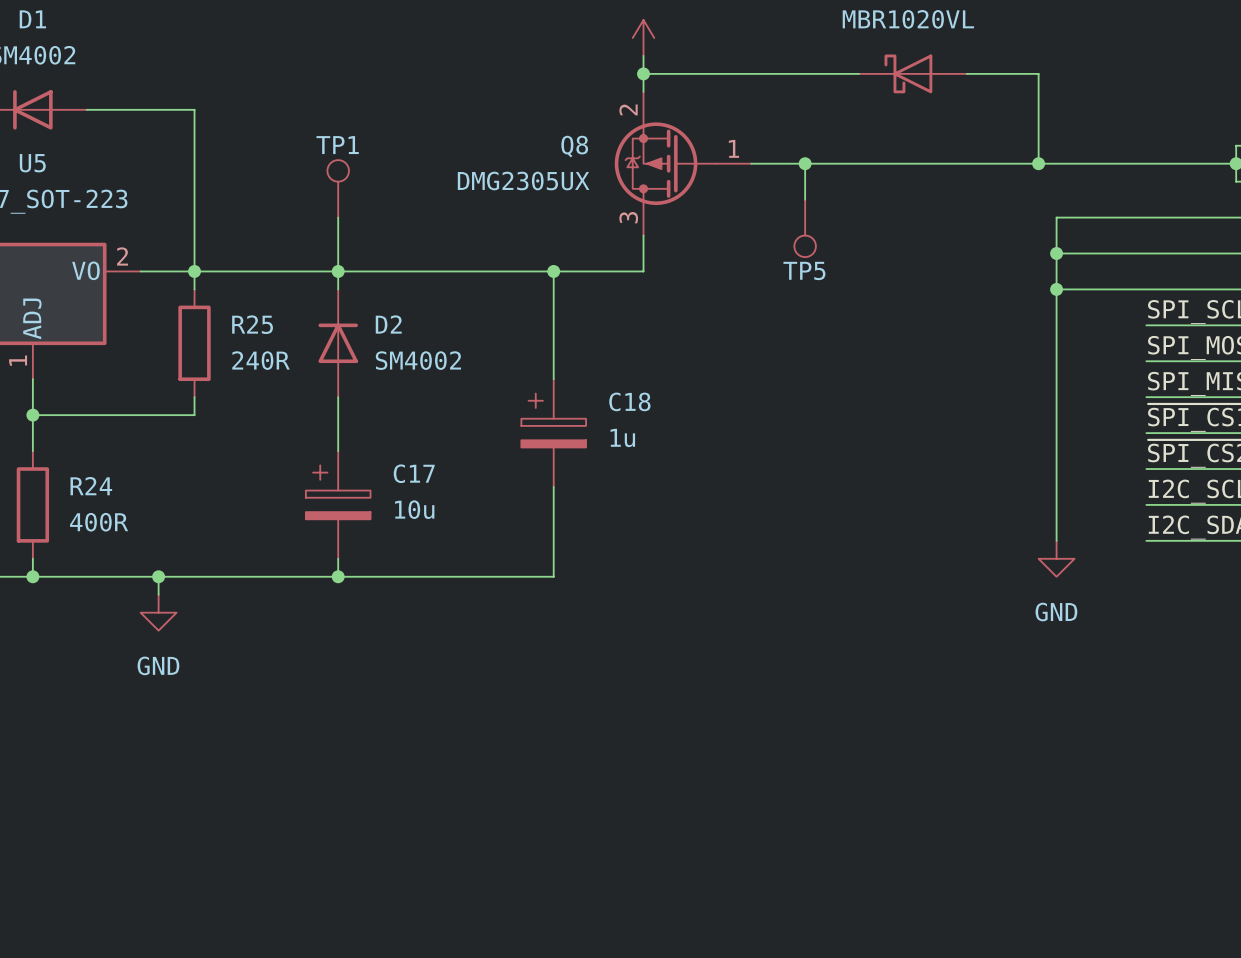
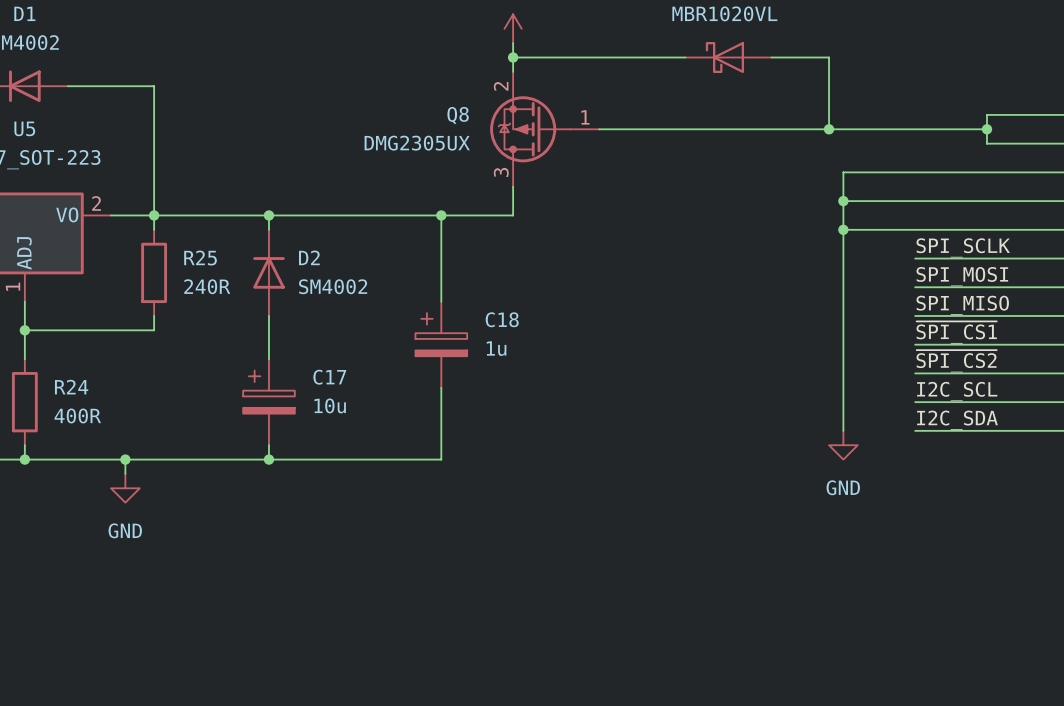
wire: (805, 163) (805, 199) -> none
junction: (805, 163) -> none
TP1: (338, 188) -> none
wire: (338, 217) (338, 271) -> none
TP5: (805, 228) -> none

